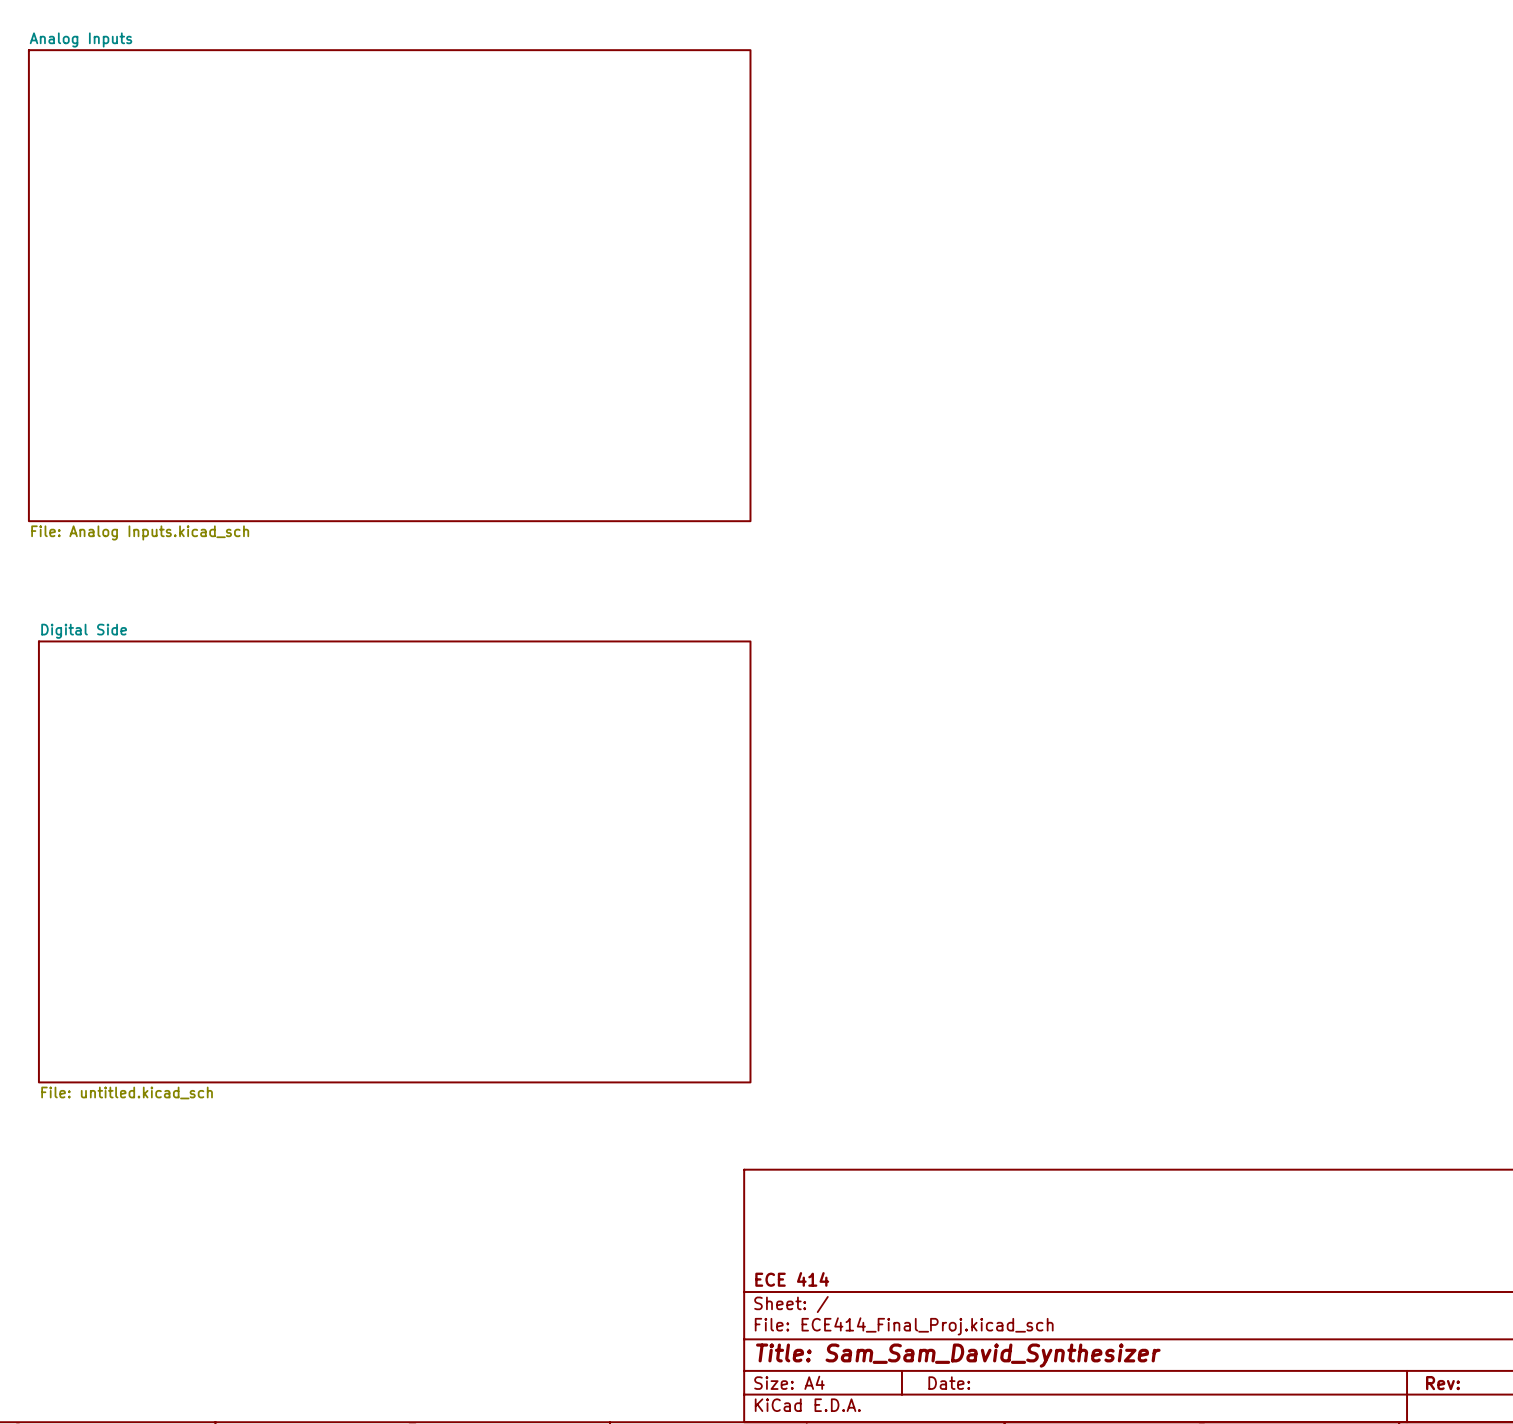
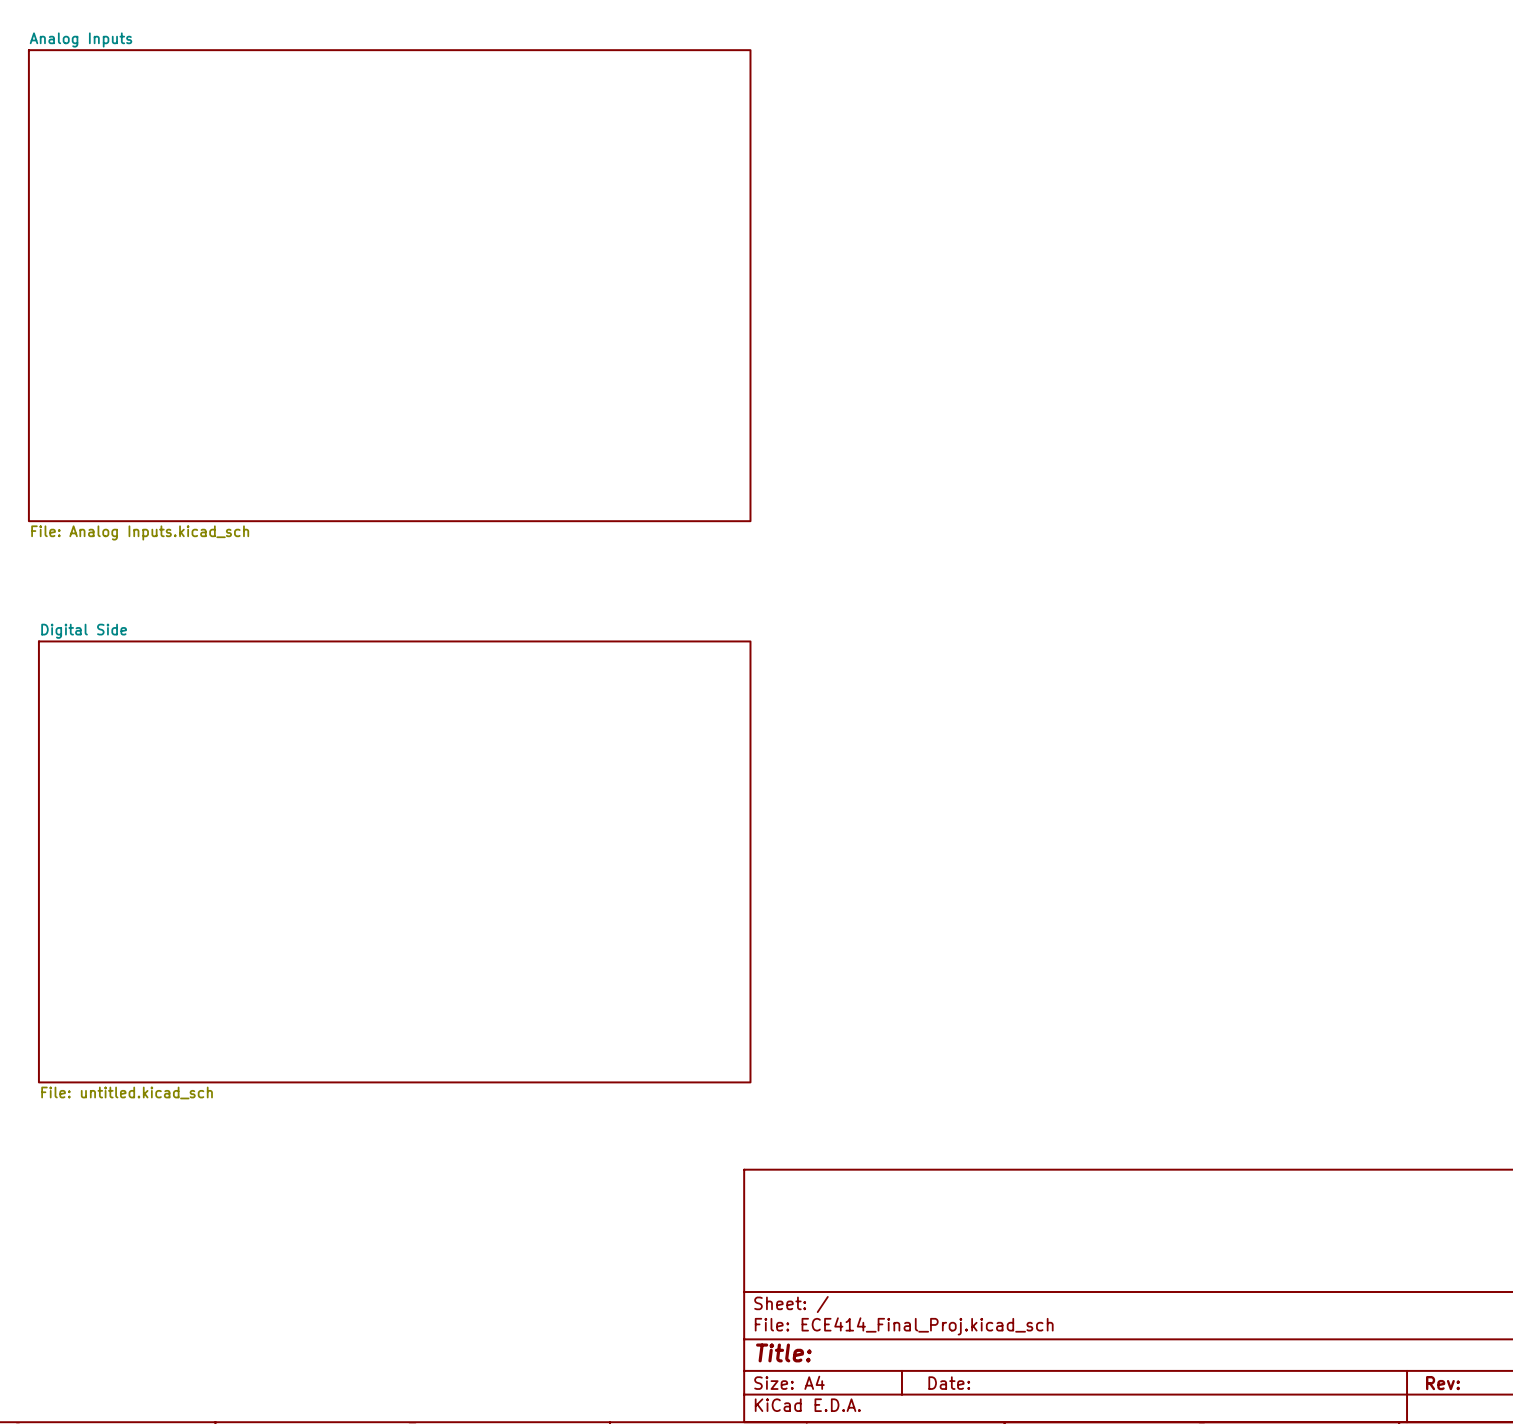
title block: ECE 414 (792, 1279) -> none
title block: Title: Sam_Sam_David_Synthesizer (958, 1355) -> Title: (783, 1352)

